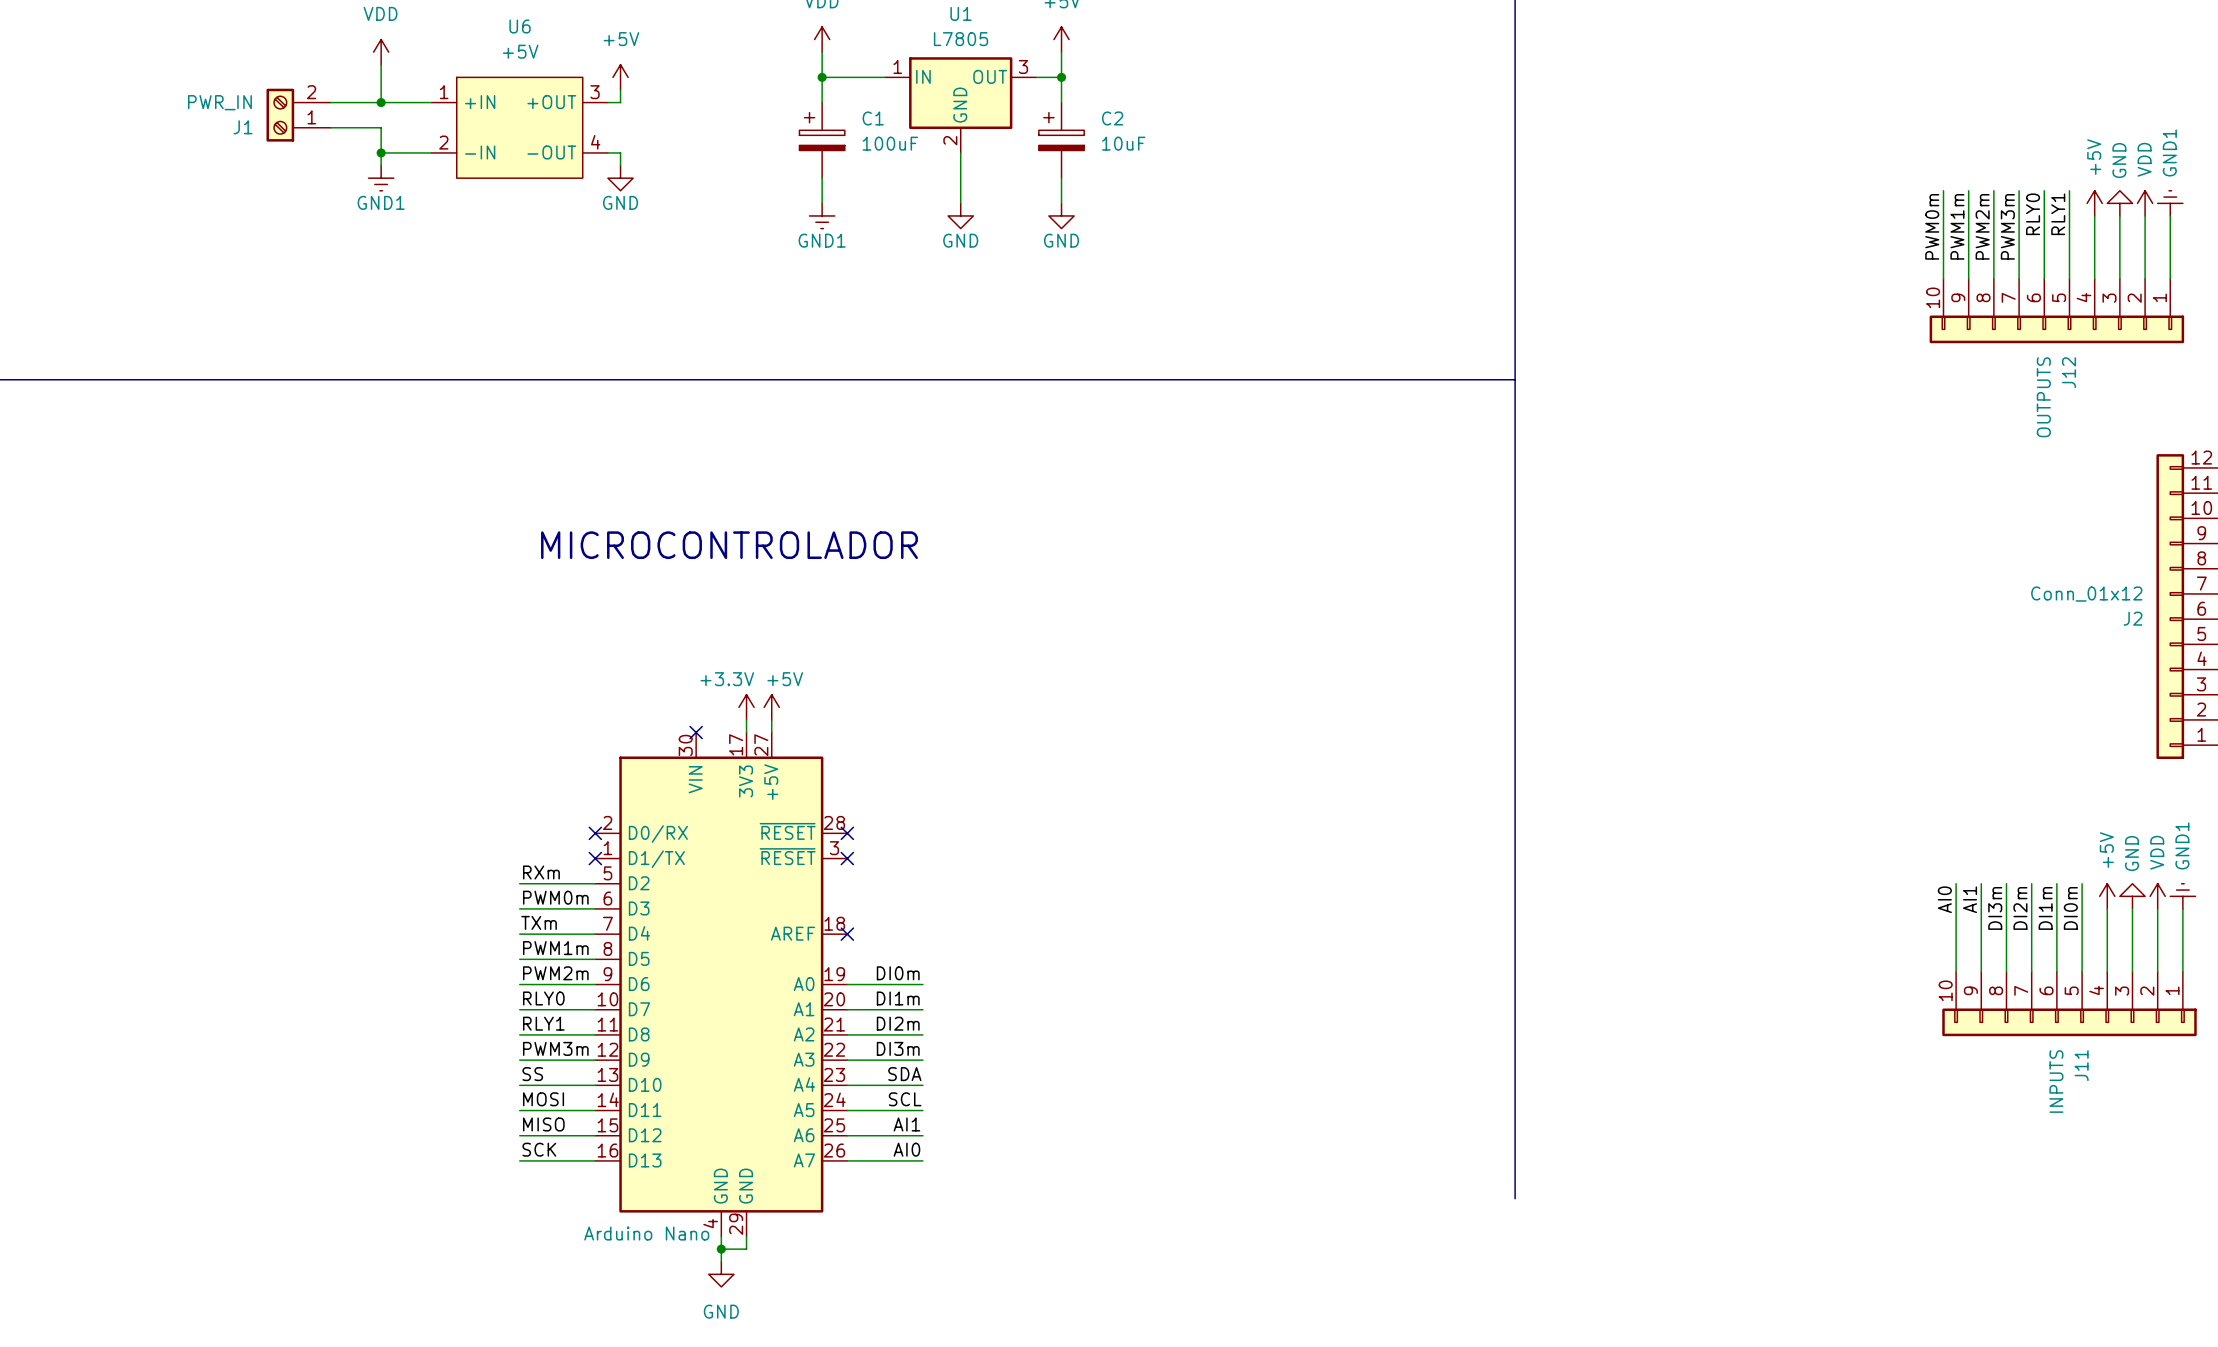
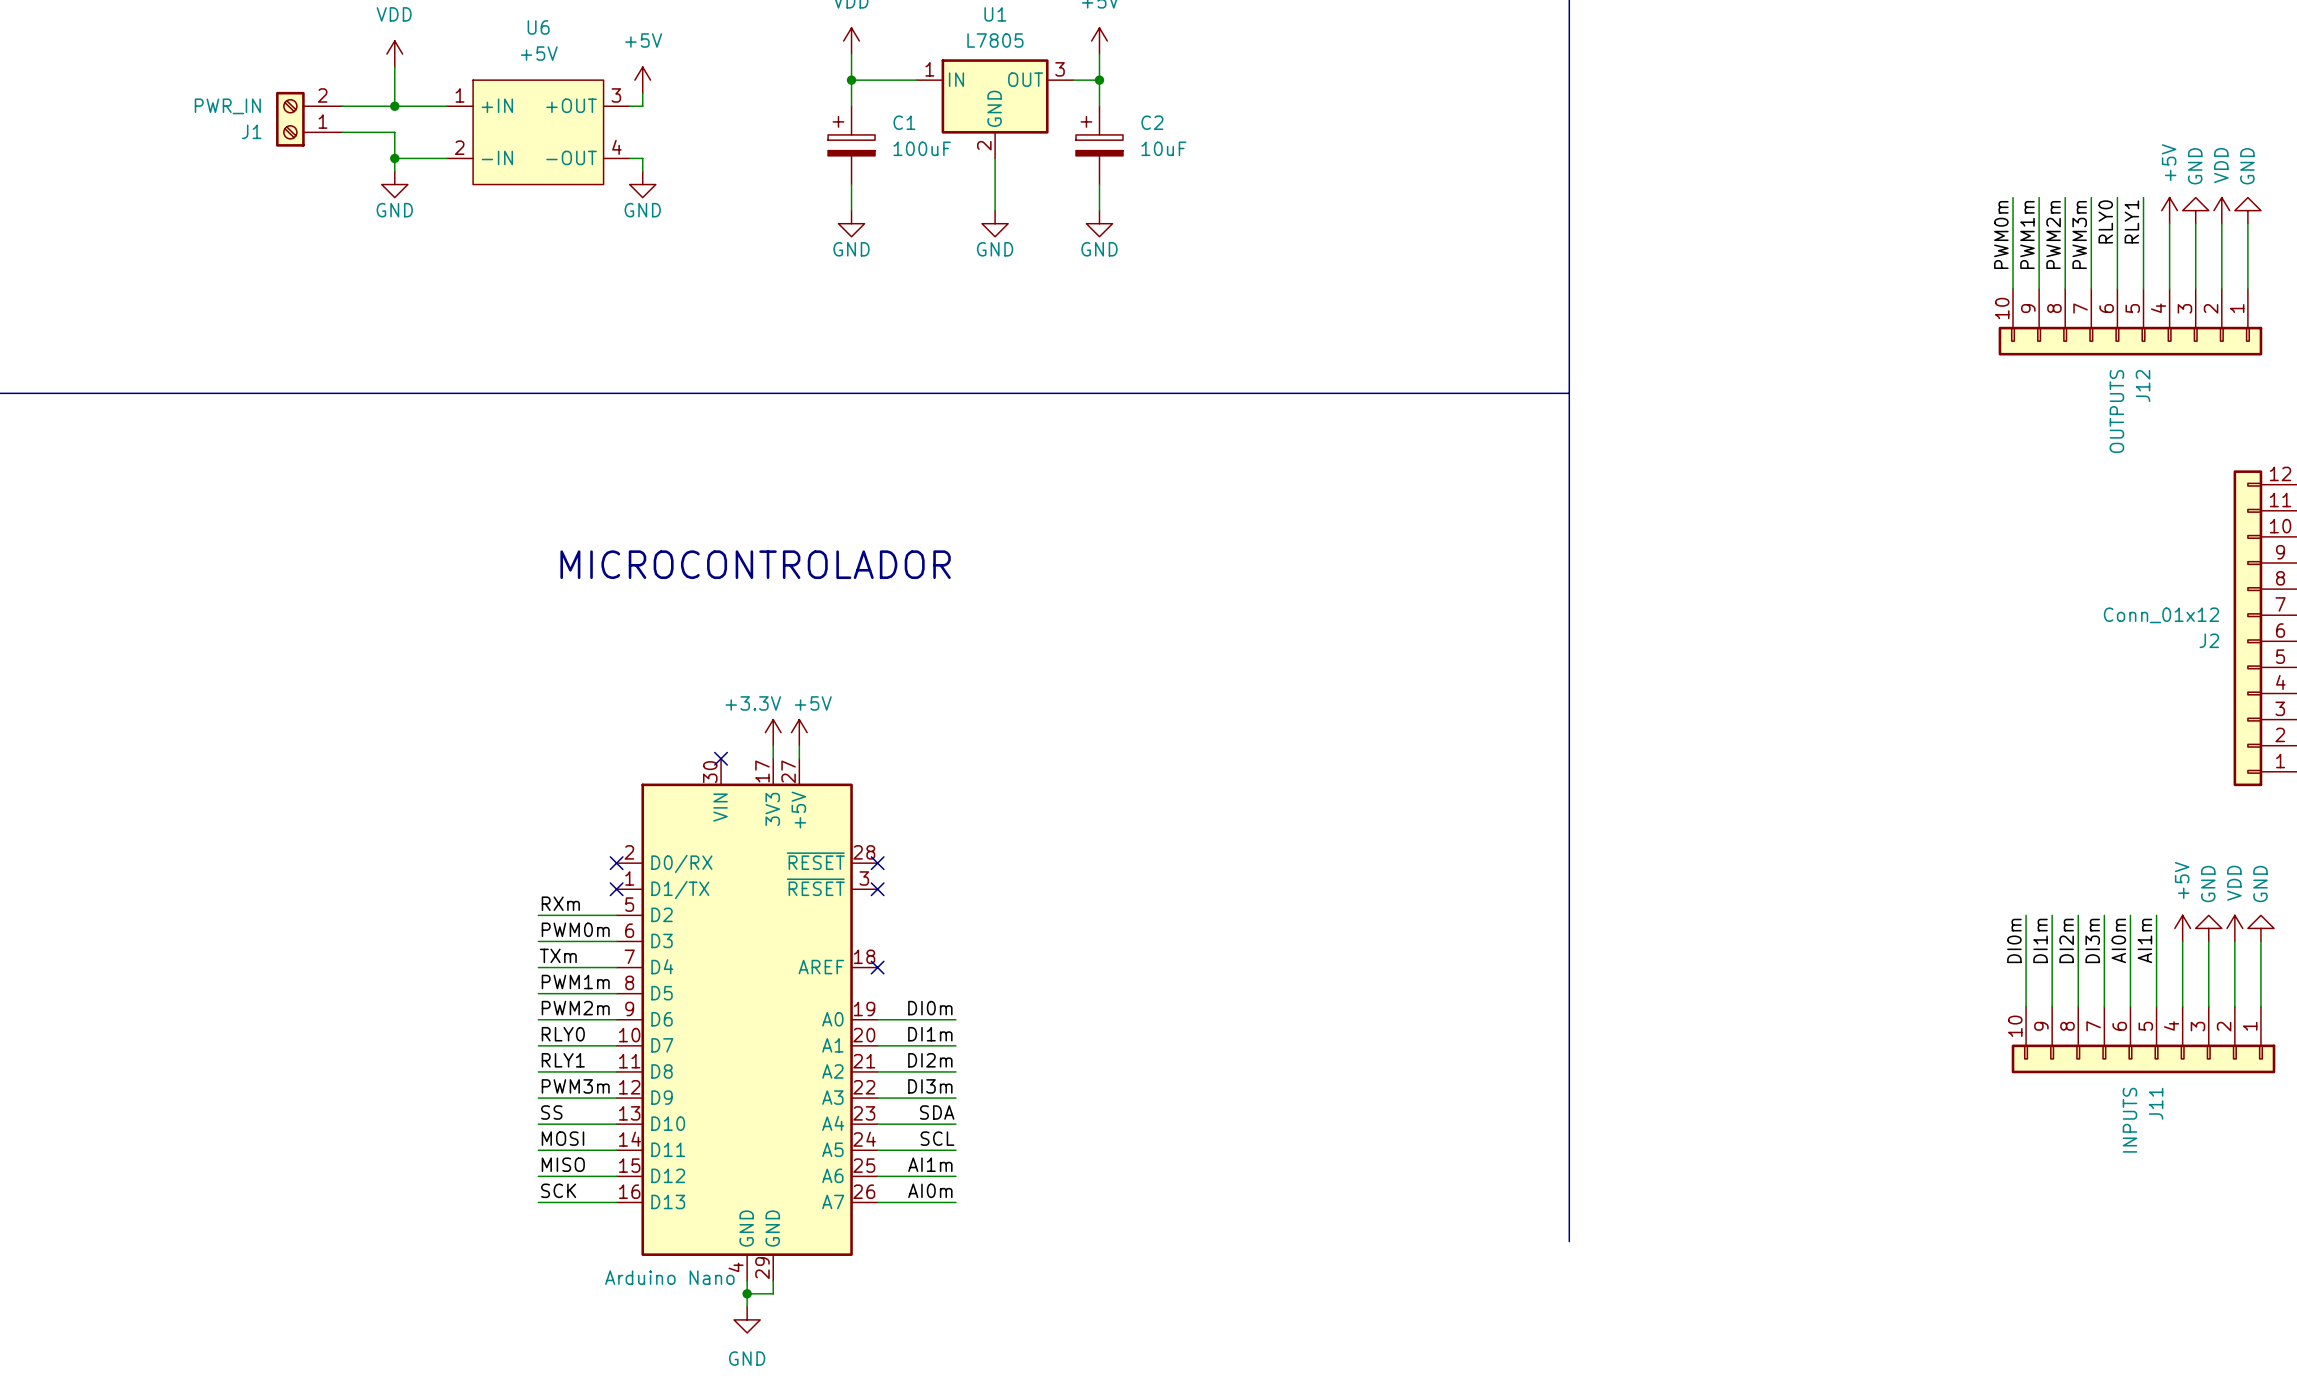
power symbol: GND1 (381, 178) -> GND (394, 184)
power symbol: GND1 (2170, 203) -> GND (2247, 210)
power symbol: GND1 (822, 215) -> GND (851, 223)
power symbol: GND1 (2182, 896) -> GND (2260, 928)
label: AI0 (1944, 899) -> DI0m (2014, 940)
label: AI1 (1970, 899) -> DI1m (2040, 940)
label: DI3m (1995, 908) -> DI2m (2066, 940)
label: DI2m (2020, 908) -> DI3m (2092, 940)
label: DI1m (2045, 908) -> AI0m (2118, 940)
label: DI0m (2070, 908) -> AI1m (2144, 940)
label: AI1 (906, 1124) -> AI1m (930, 1164)
label: AI0 (906, 1149) -> AI0m (930, 1190)

